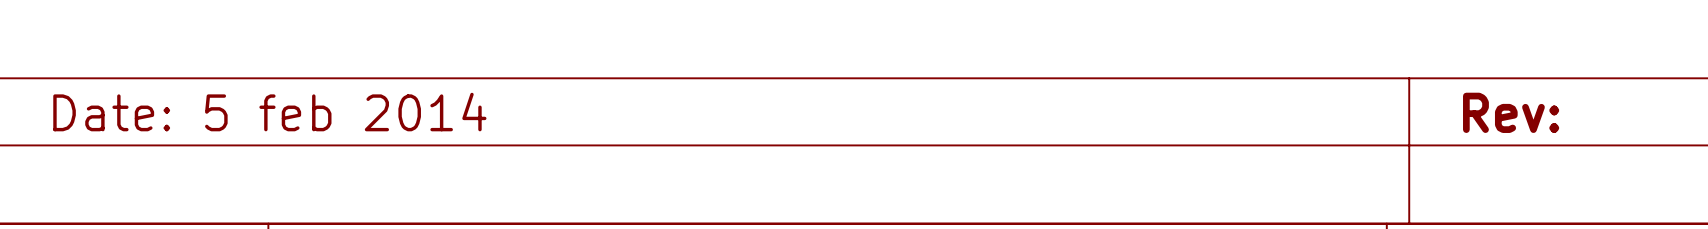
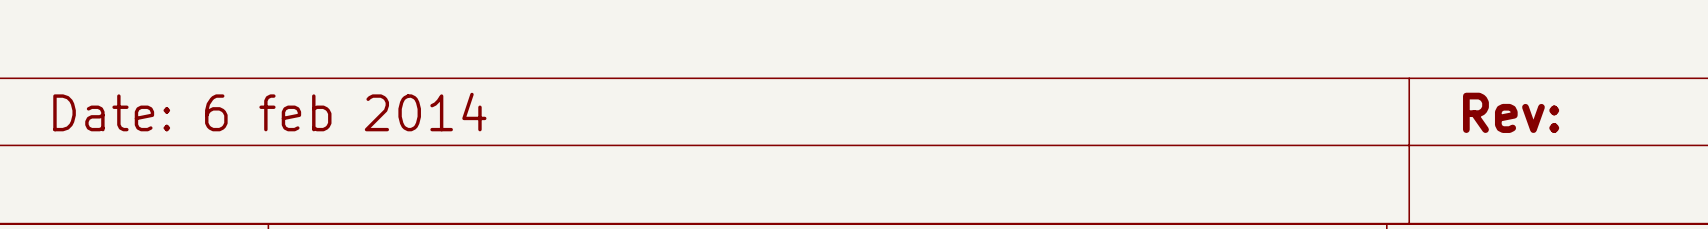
title block: Date: 5 feb 2014 (269, 112) -> Date: 6 feb 2014 (269, 112)

